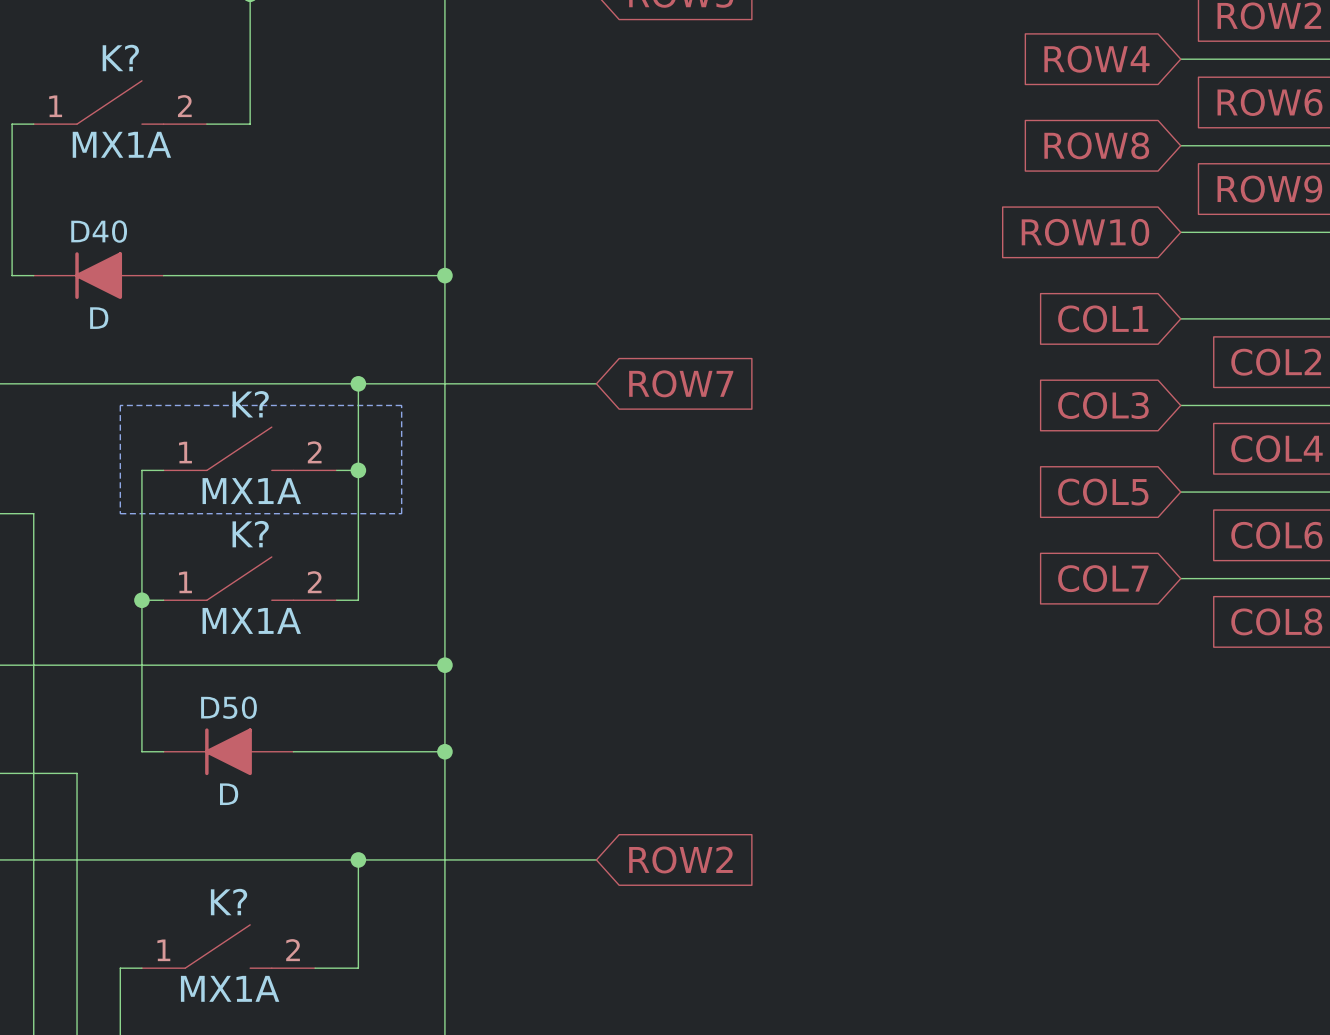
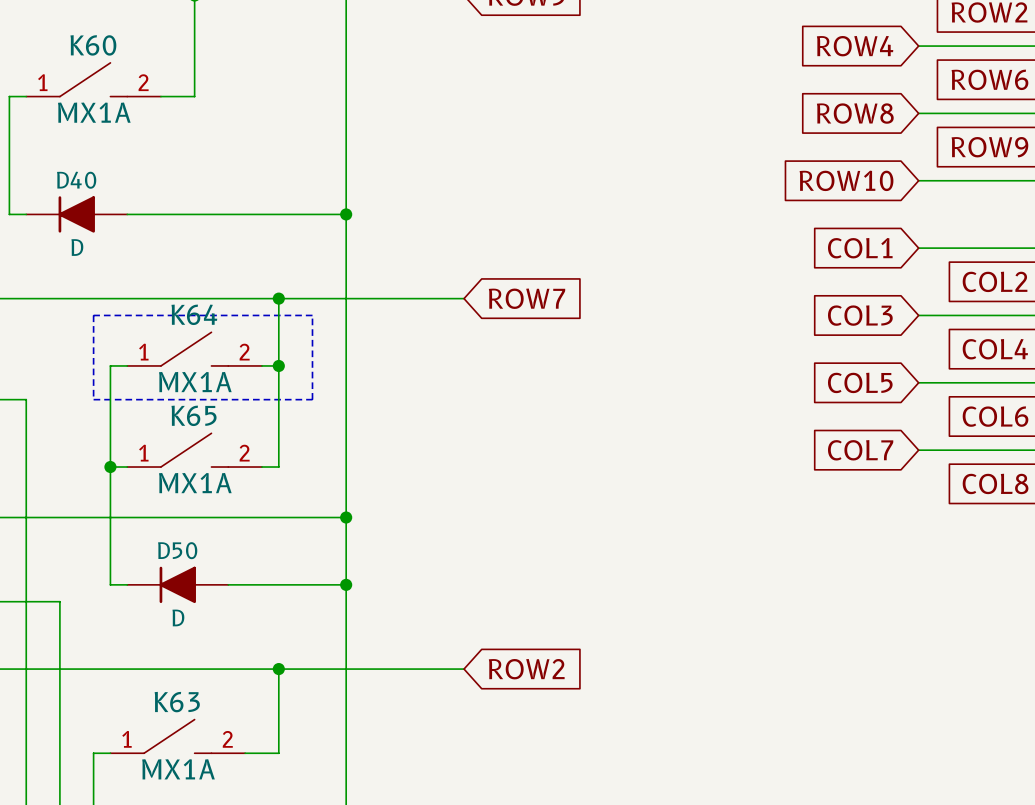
K? name: K? (120, 57) -> K60 (93, 45)
K? name: K? (250, 404) -> K64 (194, 314)
K? name: K? (250, 534) -> K65 (194, 415)
K? name: K? (229, 902) -> K63 (177, 702)

